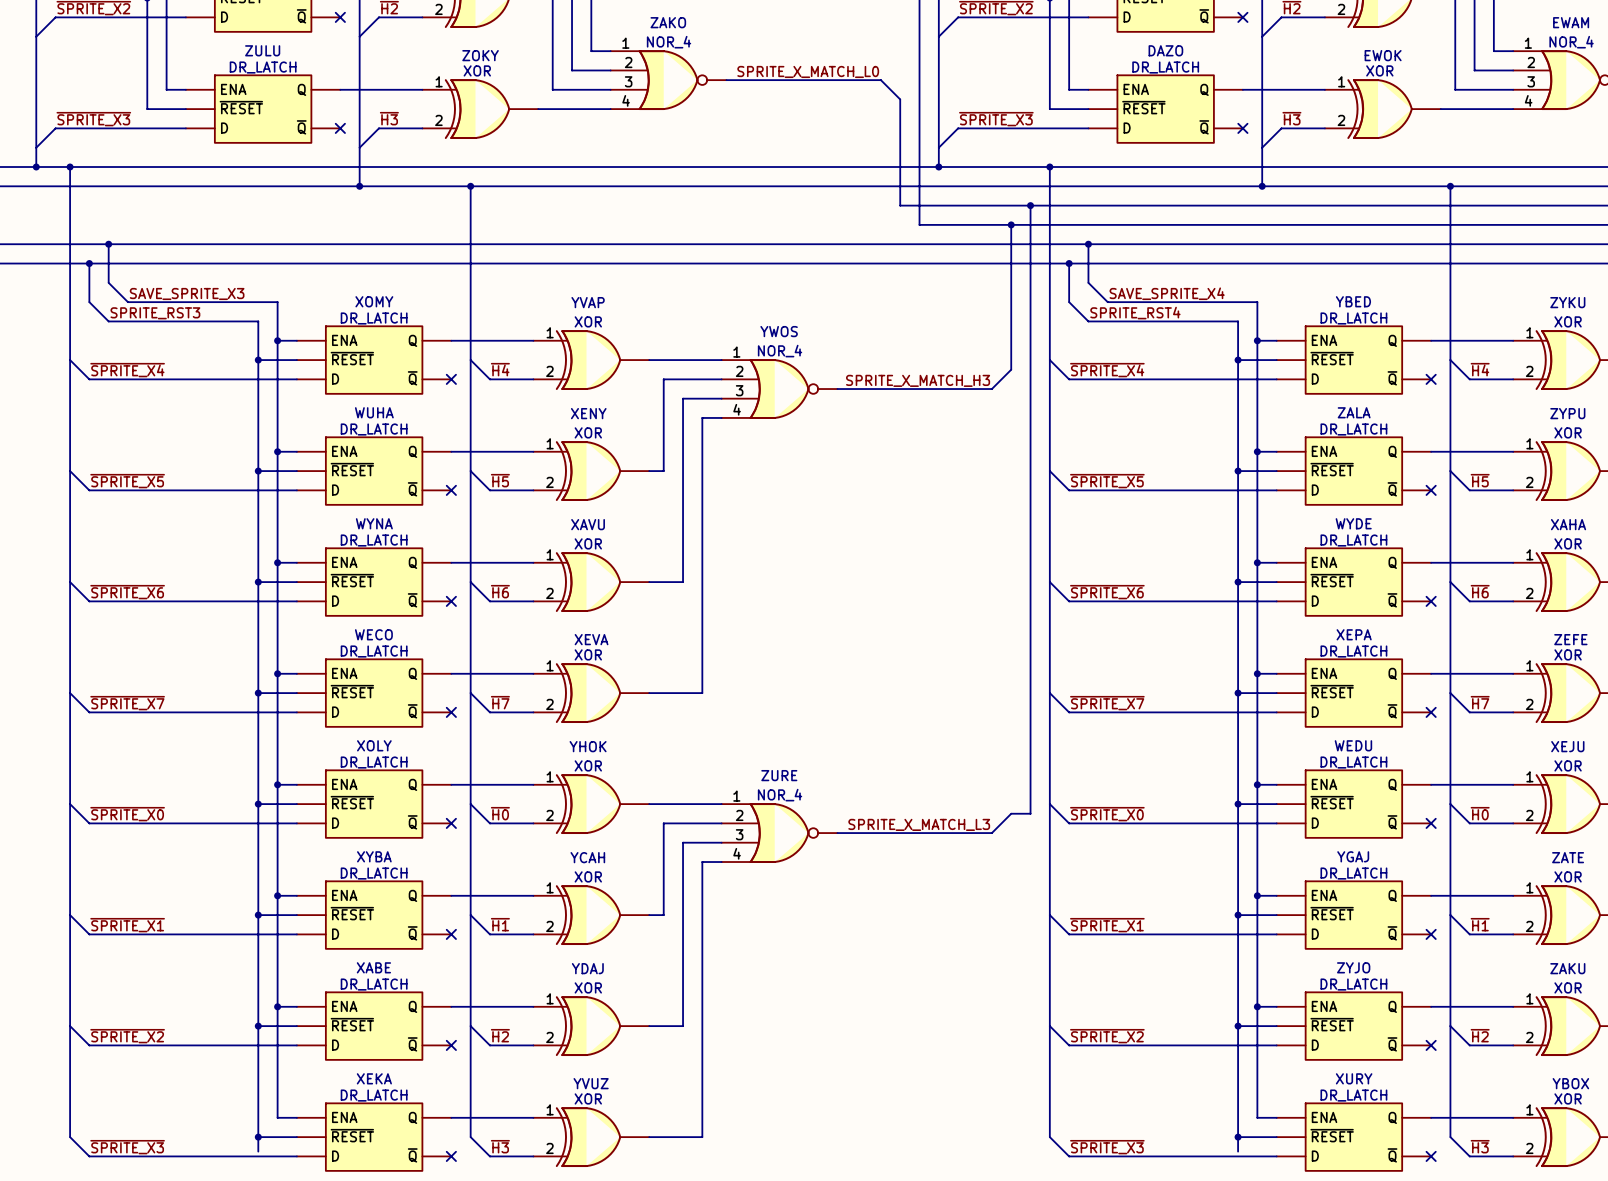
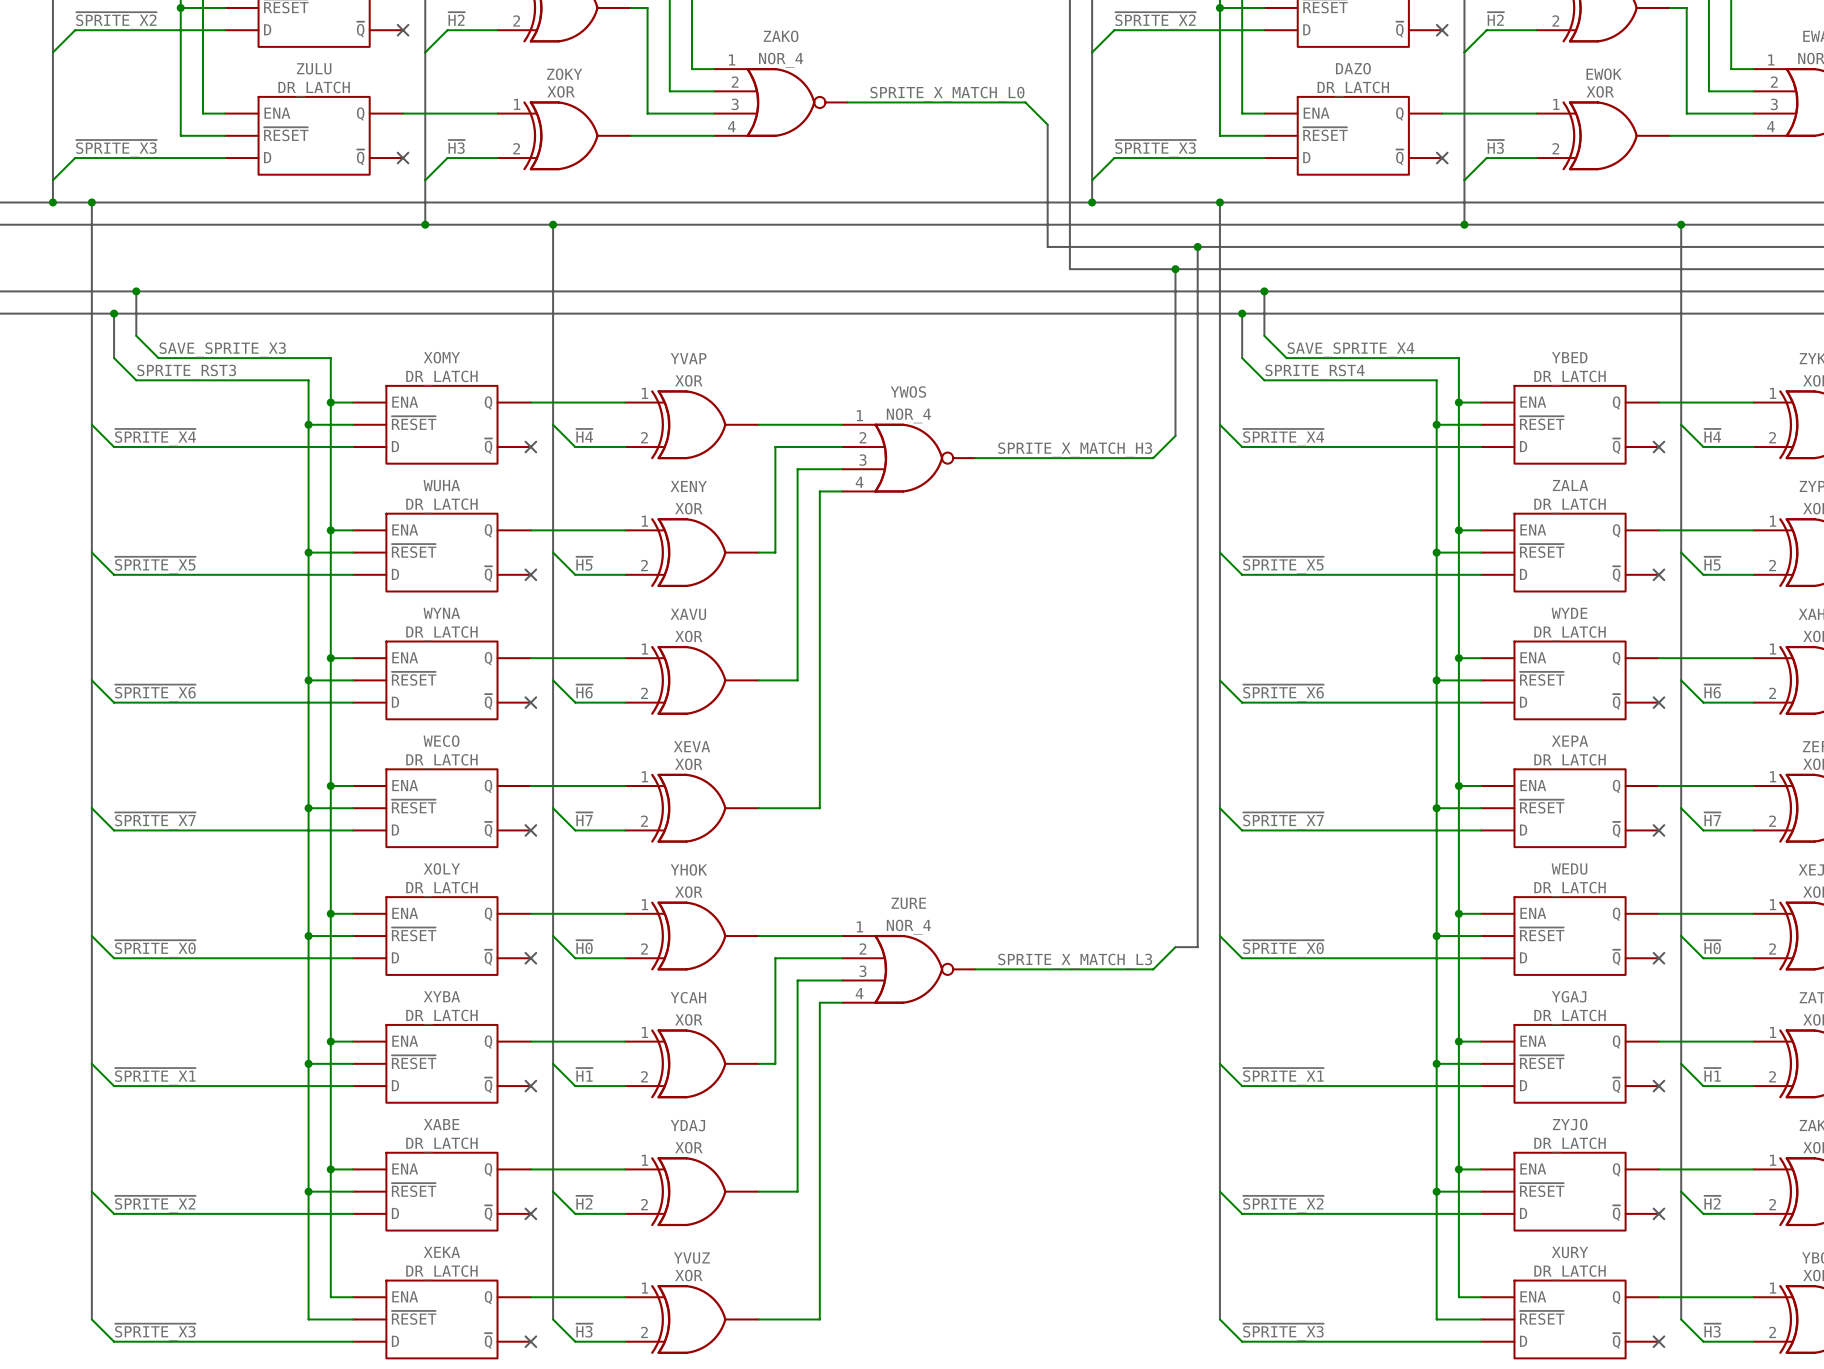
wire: (258, 1137) (258, 1151) -> none
junction: (258, 1137) -> none
wire: (1238, 1137) (1238, 1151) -> none
junction: (1238, 1137) -> none

